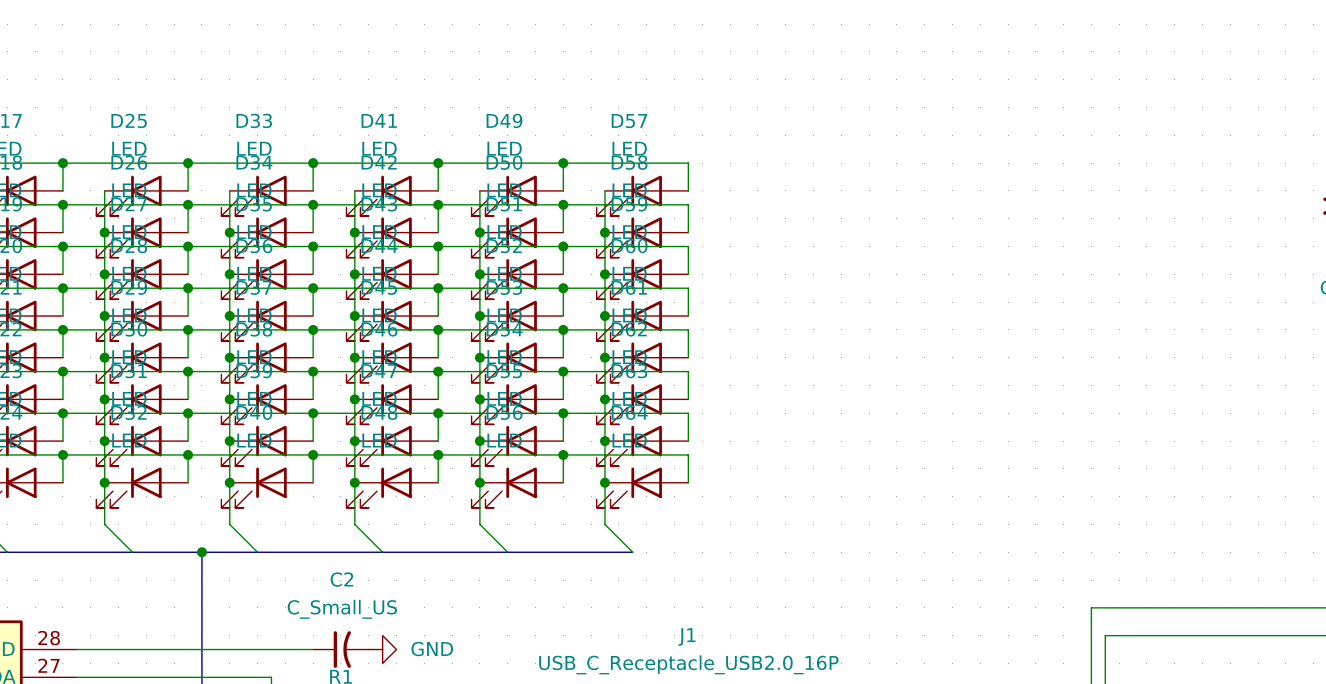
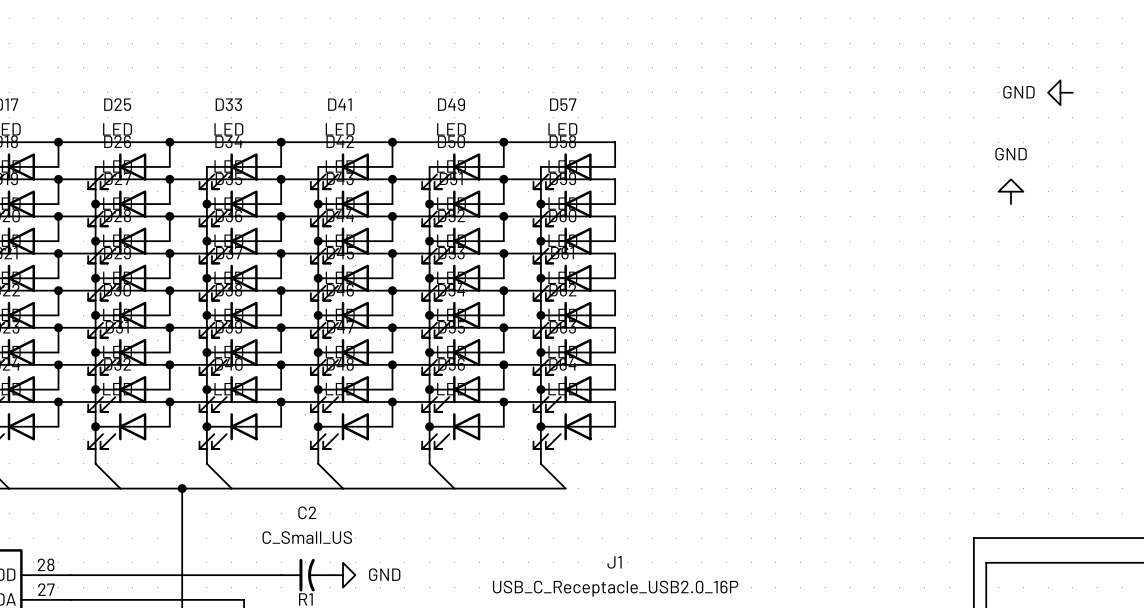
power symbol: none -> GND (1060, 92)
power symbol: none -> GND (1010, 191)

